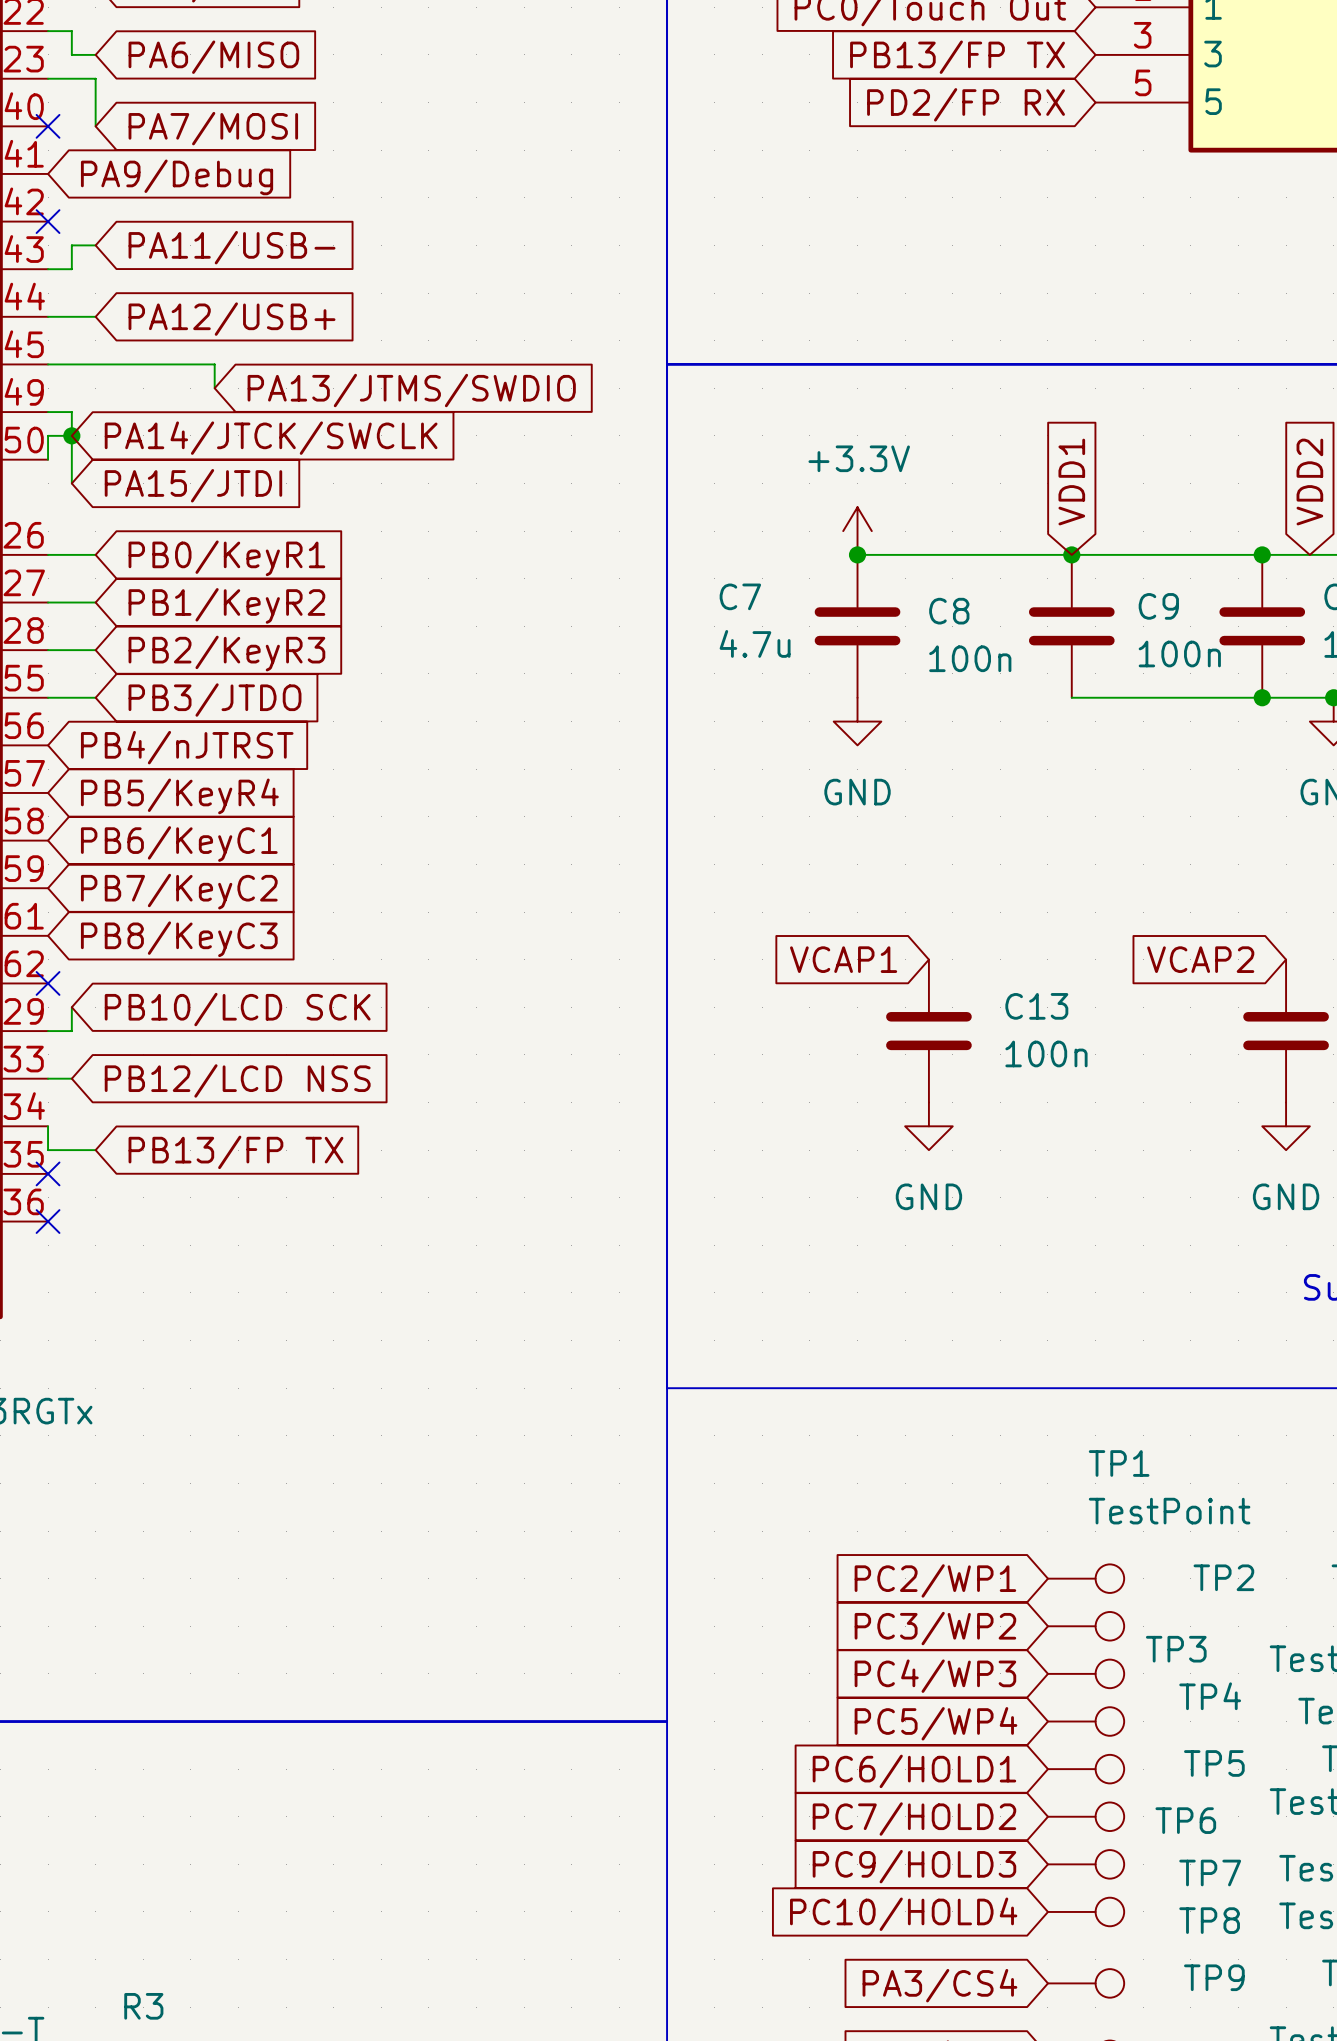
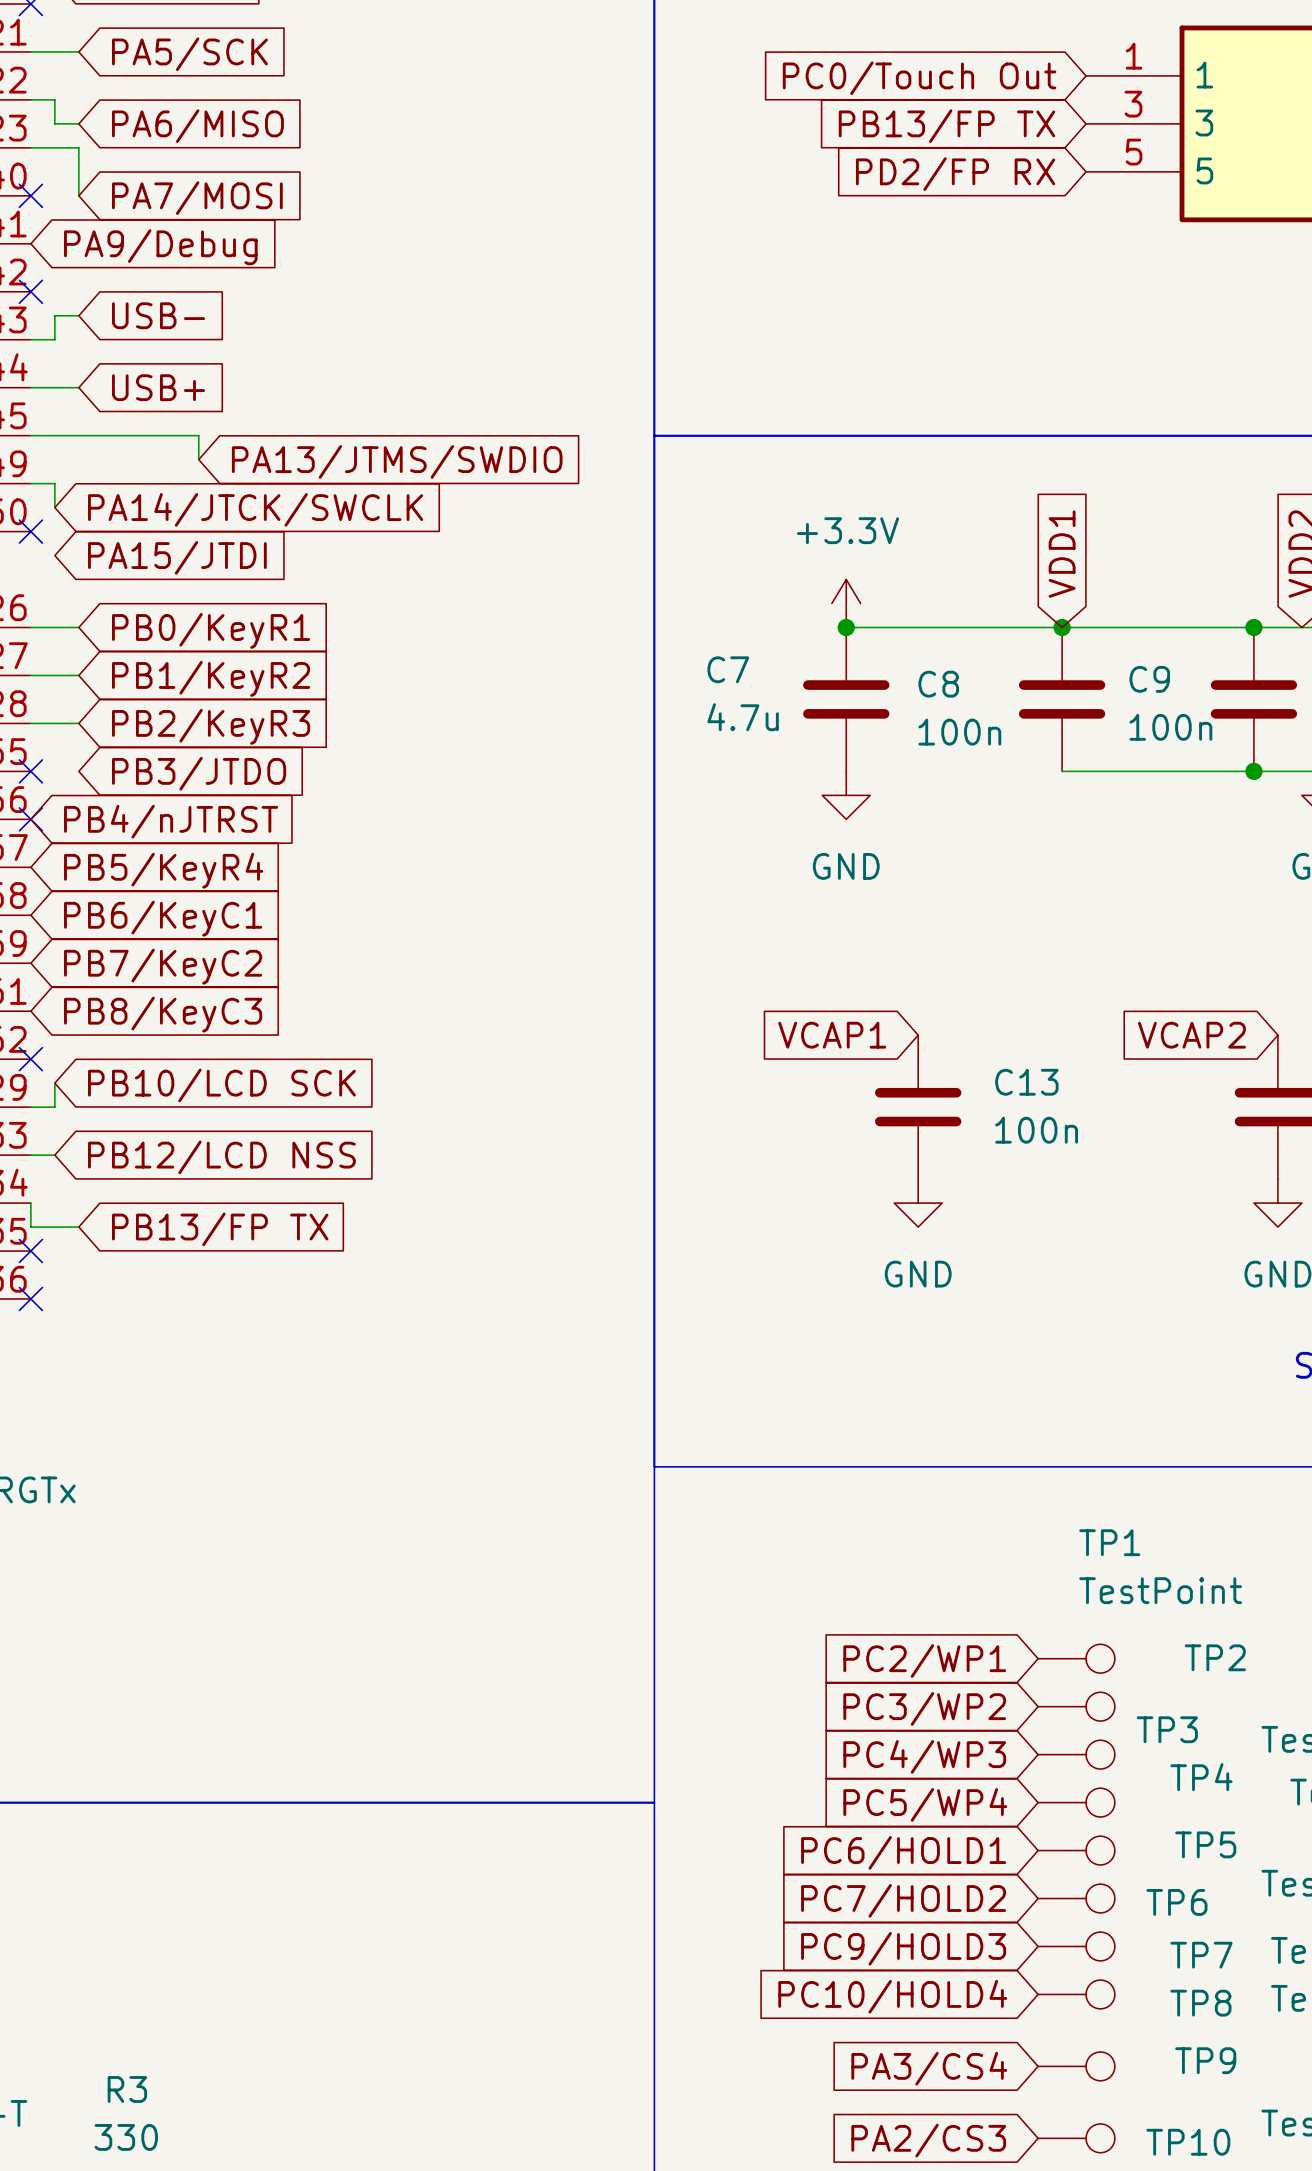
global label: PA11/USB- (232, 247) -> USB- (158, 315)
global label: PA12/USB+ (232, 319) -> USB+ (158, 387)
junction: (71, 435) -> none
wire: (48, 459) (48, 435) (71, 435) (71, 483) -> none
no-connect mark: none -> (30, 531)
wire: (48, 697) (95, 697) -> none
no-connect mark: none -> (30, 771)
no-connect mark: none -> (30, 819)

